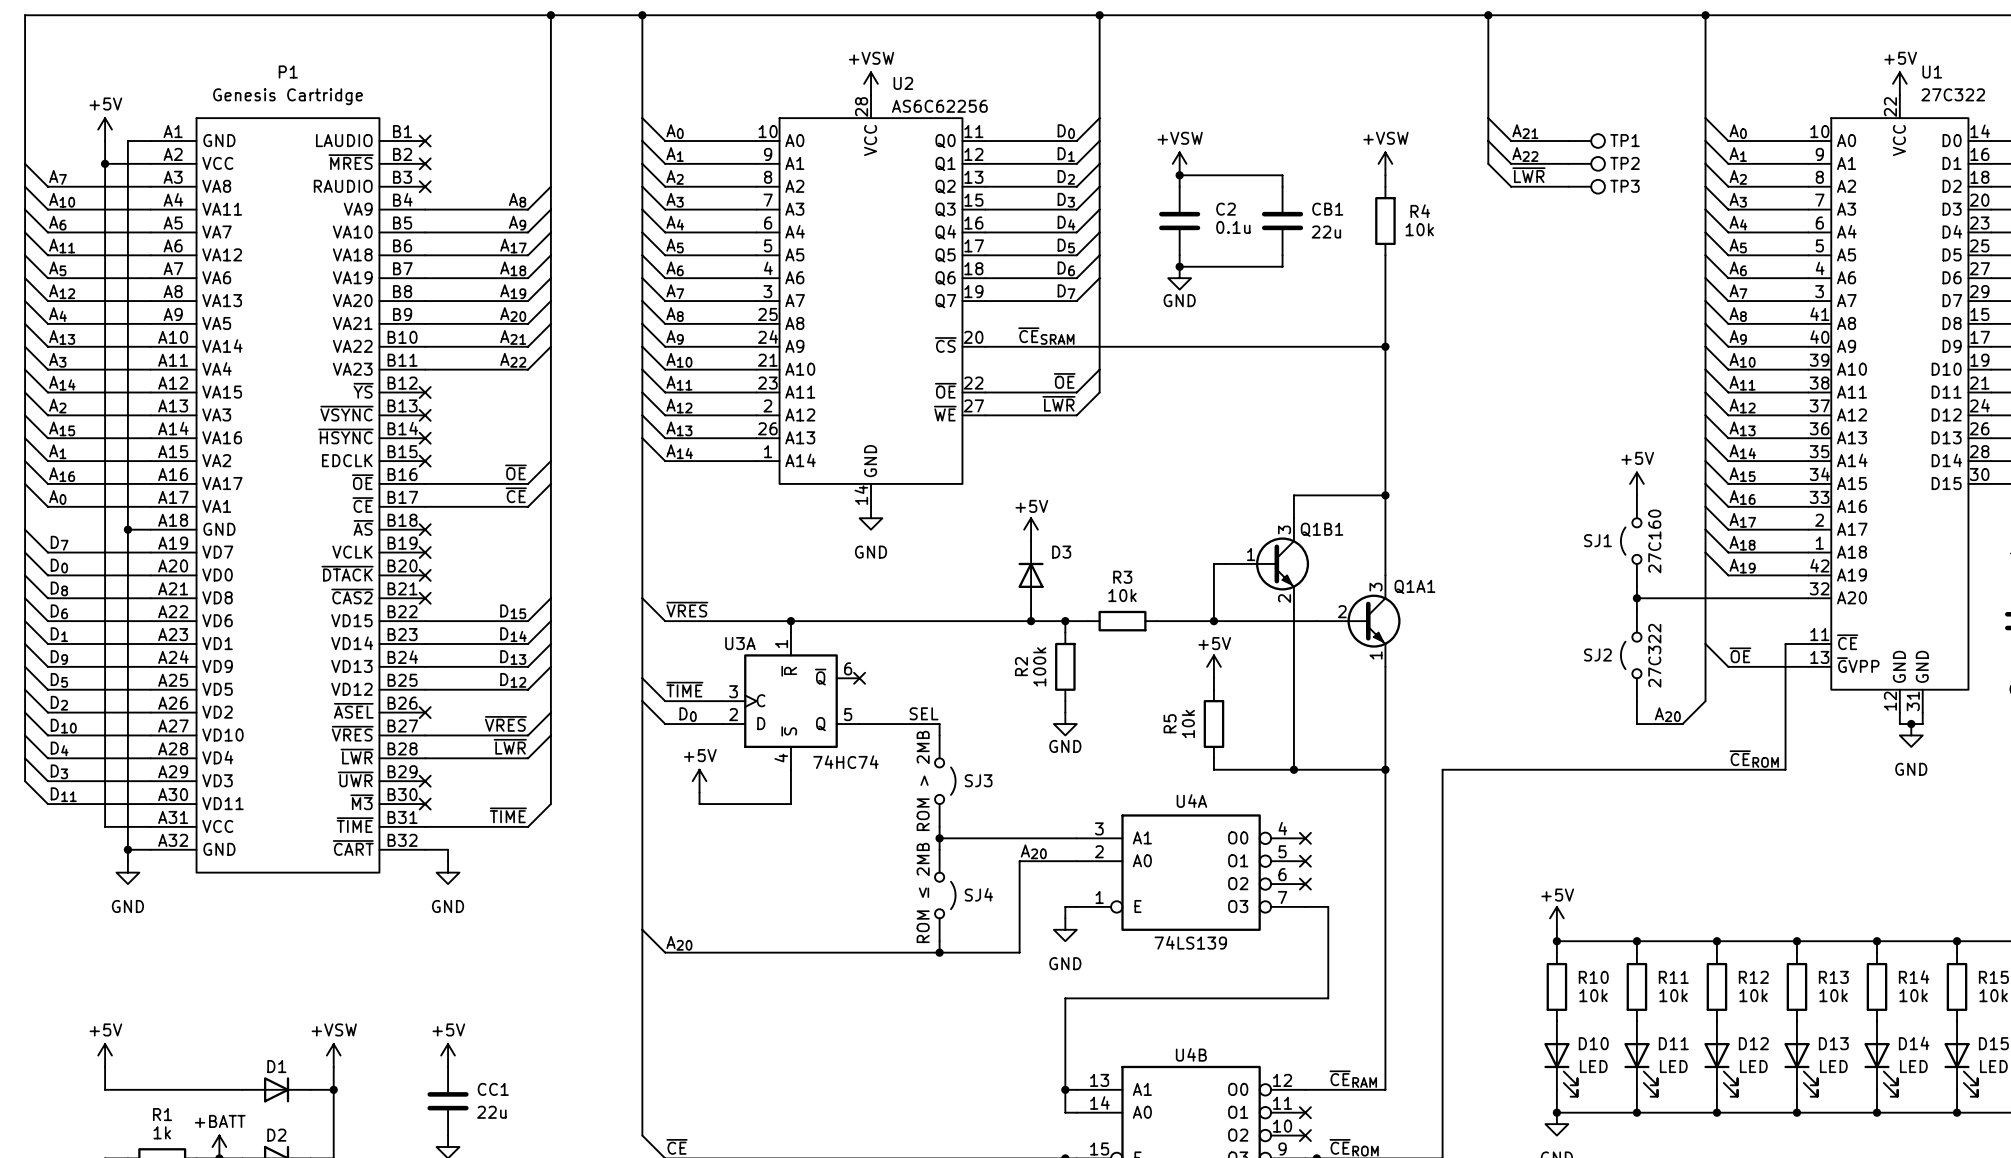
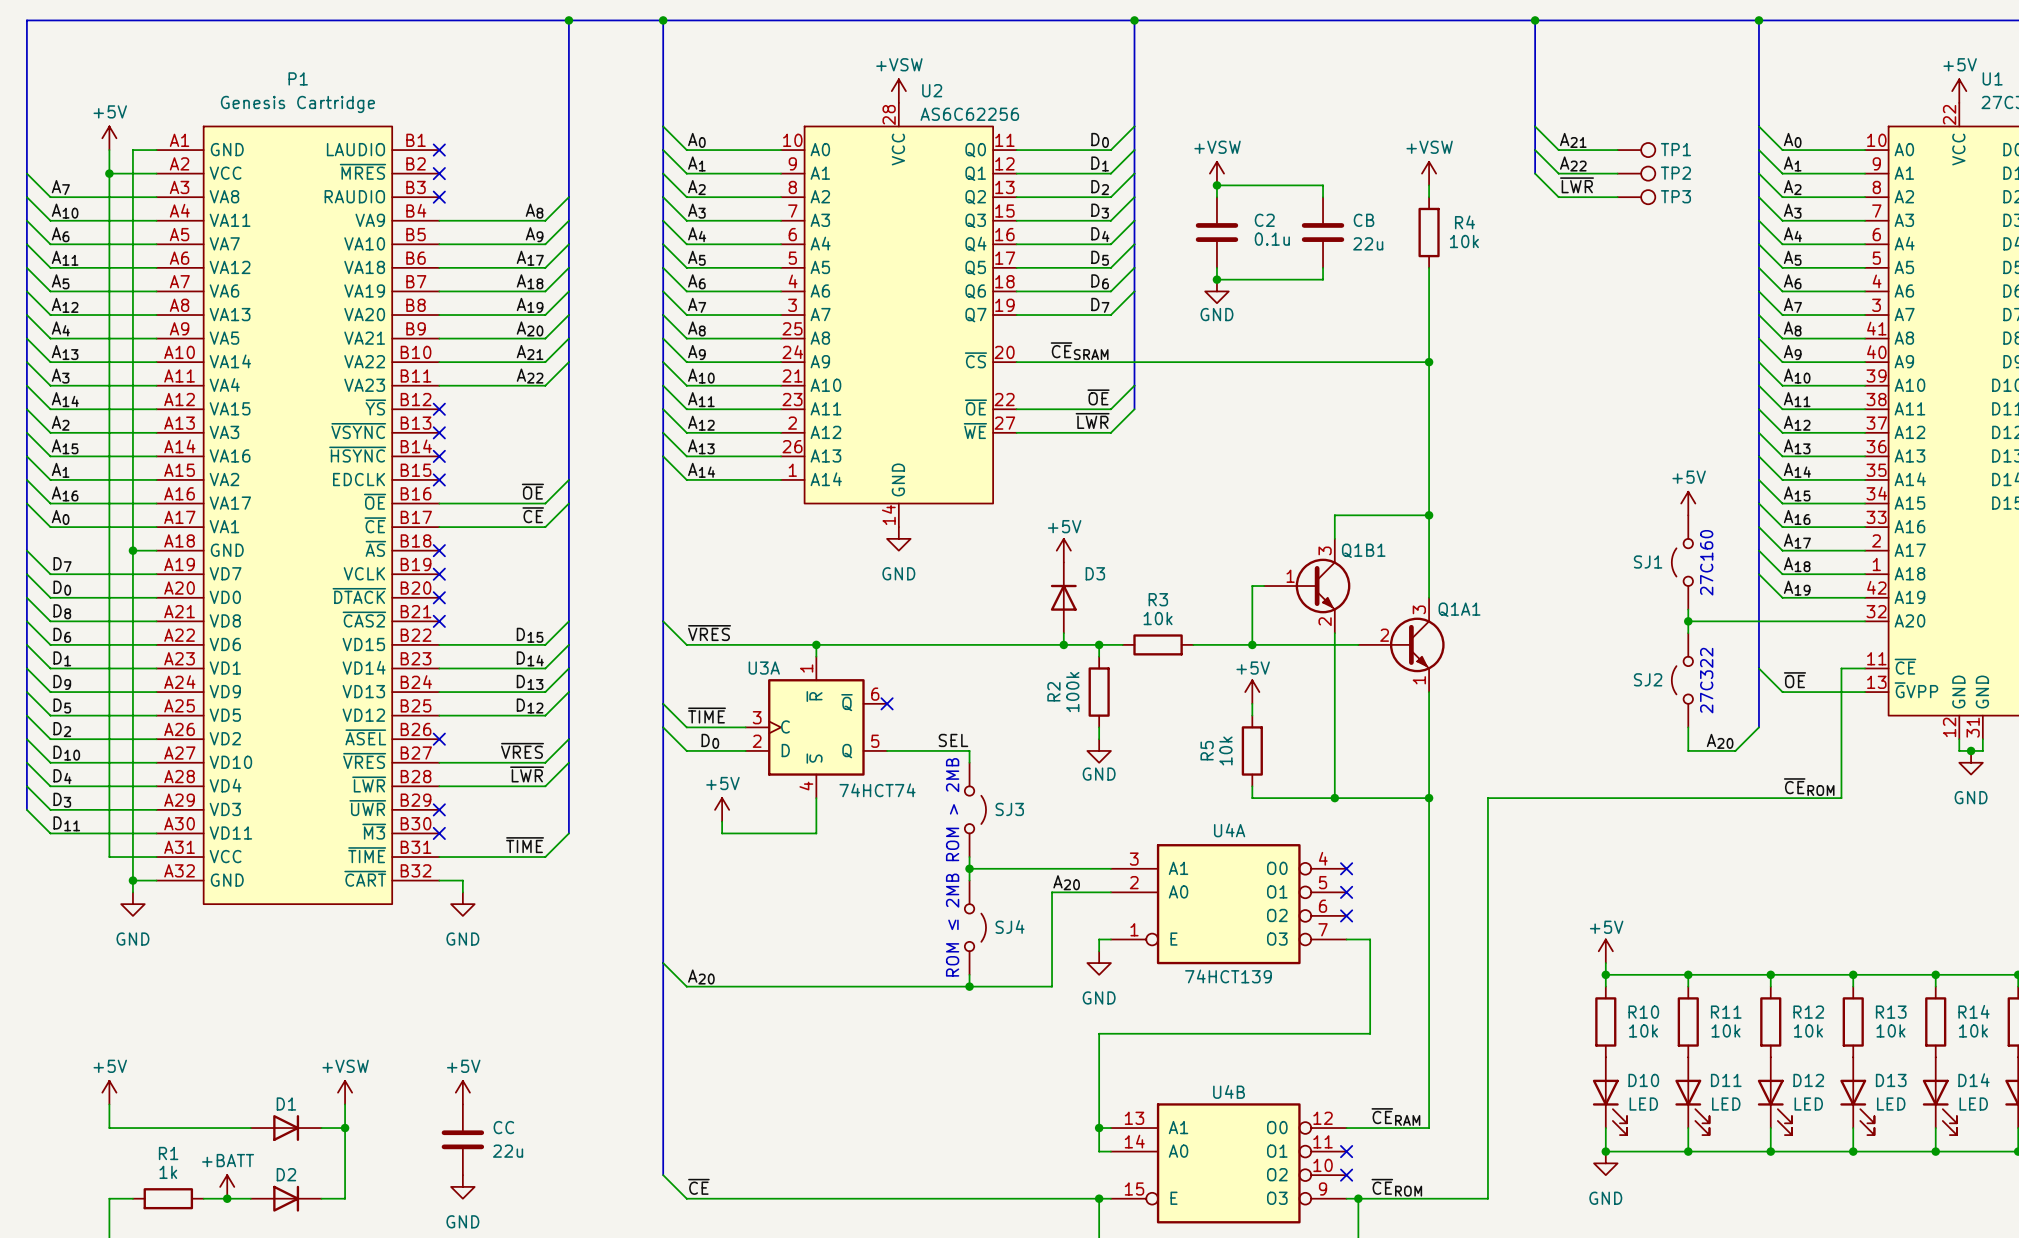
CB1 name: CB1 (1327, 209) -> CB (1364, 220)
U3A value: 74HC74 (845, 762) -> 74HCT74 (877, 790)
U4A value: 74LS139 (1190, 942) -> 74HCT139 (1228, 976)
CC1 name: CC1 (493, 1089) -> CC (503, 1127)

